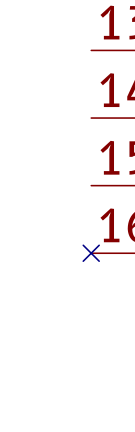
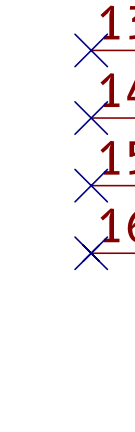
no-connect mark: none -> (91, 50)
no-connect mark: none -> (91, 118)
no-connect mark: none -> (91, 185)
no-connect mark: none -> (91, 253)

